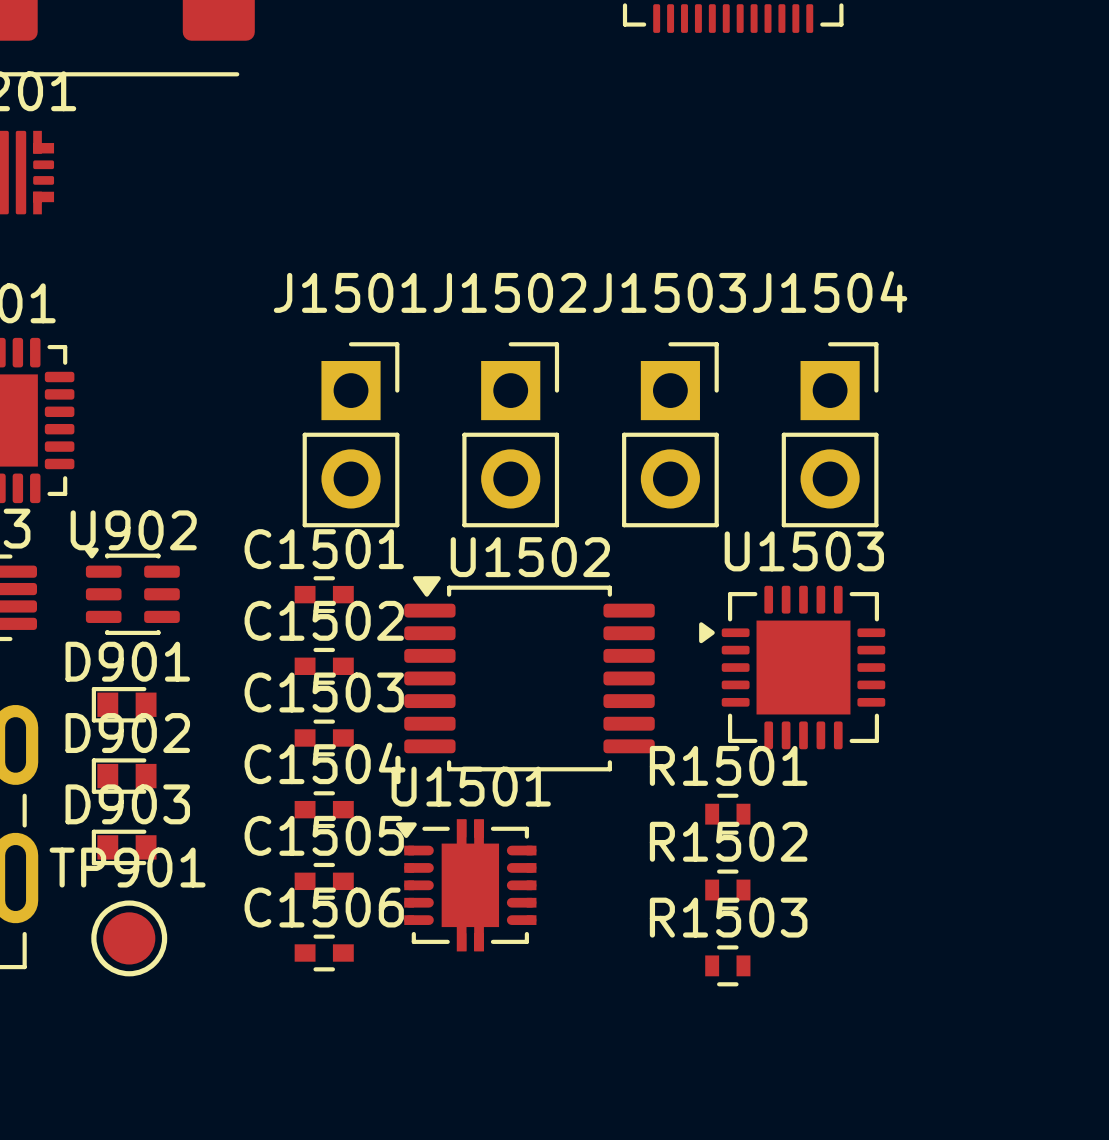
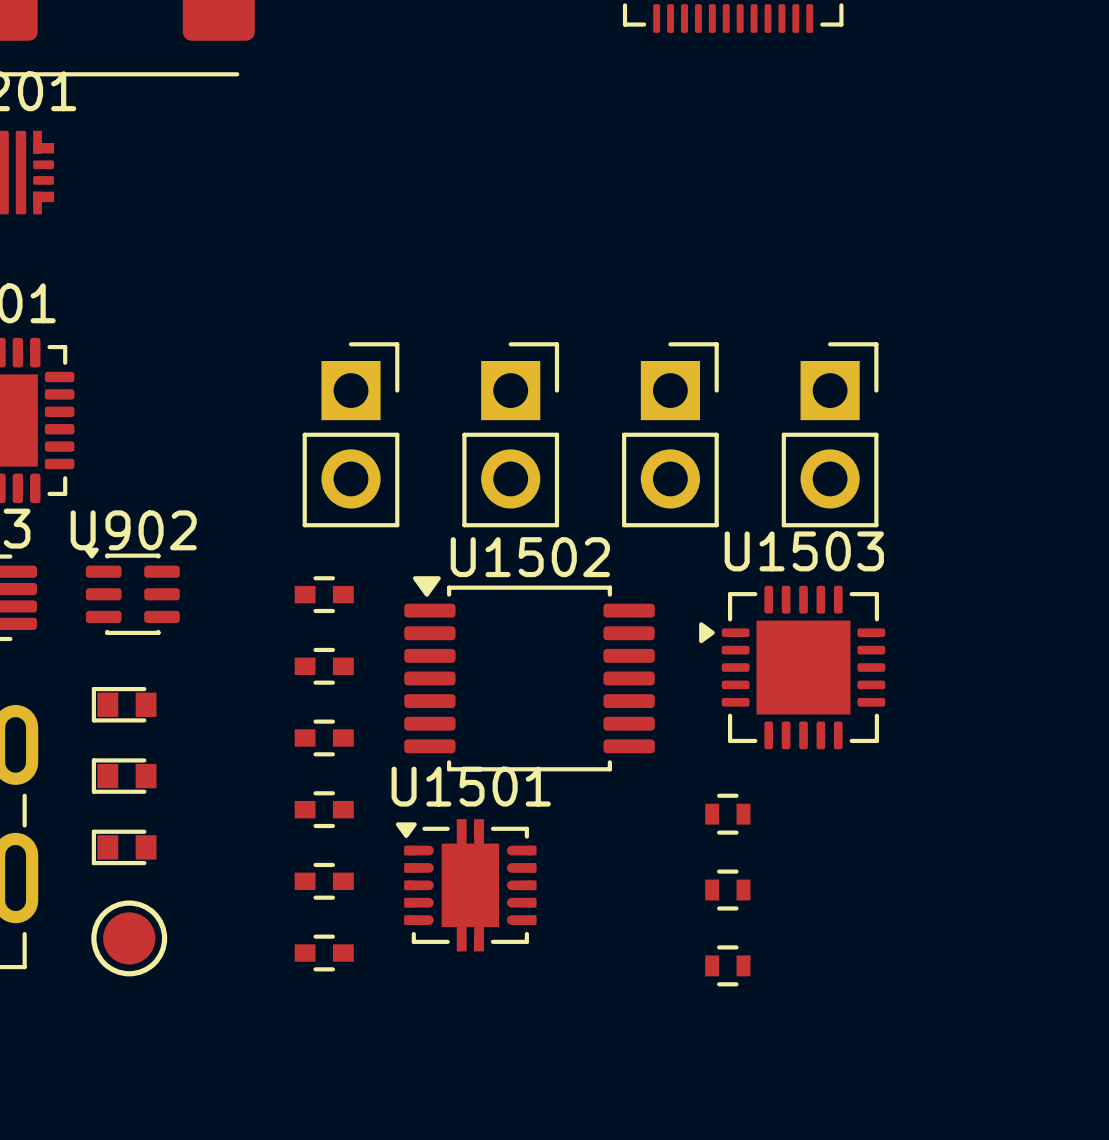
J1501 name: J1501 (350, 292) -> none
J1502 name: J1502 (509, 292) -> none
J1503 name: J1503 (669, 292) -> none
J1504 name: J1504 (830, 292) -> none
C1501 name: C1501 (324, 549) -> none
C1502 name: C1502 (324, 620) -> none
D901 name: D901 (127, 661) -> none
C1503 name: C1503 (324, 692) -> none
D902 name: D902 (127, 733) -> none
C1504 name: C1504 (325, 763) -> none
R1501 name: R1501 (728, 765) -> none
D903 name: D903 (127, 804) -> none
C1505 name: C1505 (324, 835) -> none
R1502 name: R1502 (728, 841) -> none
TP901 name: TP901 (127, 867) -> none
C1506 name: C1506 (324, 907) -> none
R1503 name: R1503 (728, 917) -> none

